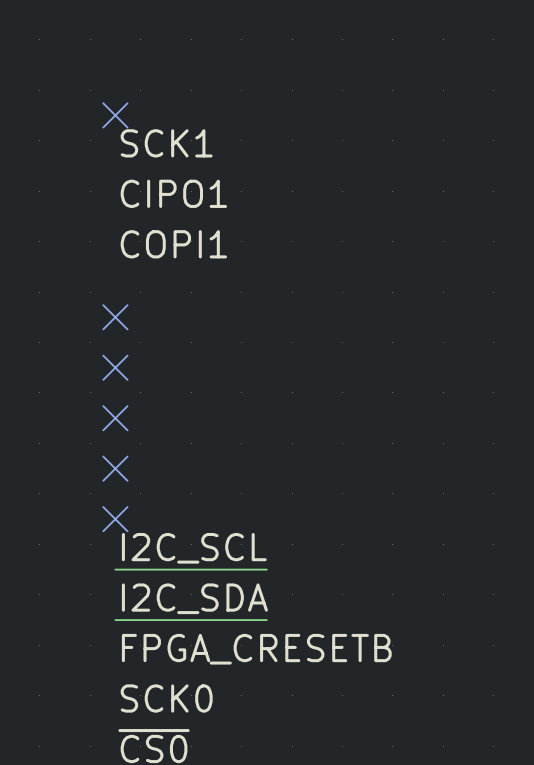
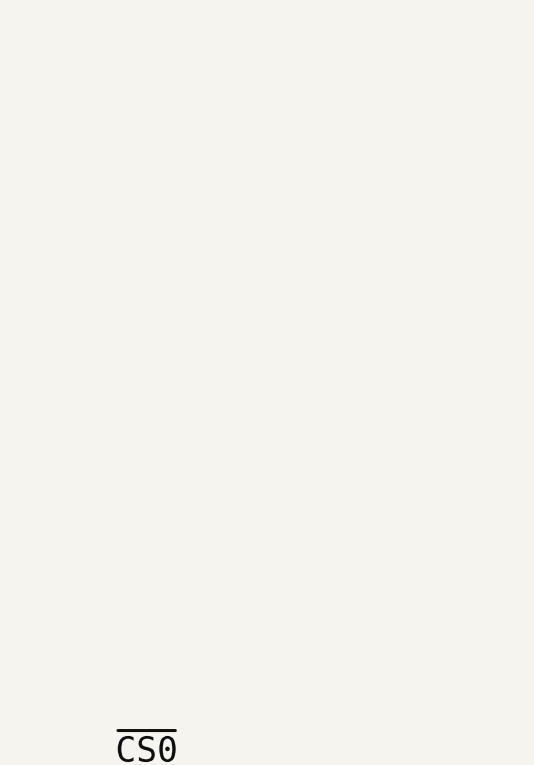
no-connect mark: (115, 115) -> none
label: SCK1 (166, 143) -> none
label: CIPO1 (173, 193) -> none
label: COPI1 (173, 244) -> none
no-connect mark: (115, 317) -> none
no-connect mark: (115, 367) -> none
no-connect mark: (115, 418) -> none
no-connect mark: (115, 468) -> none
no-connect mark: (115, 519) -> none
label: I2C_SCL (194, 548) -> none
wire: (115, 569) (266, 569) -> none
label: I2C_SDA (194, 598) -> none
wire: (115, 620) (266, 620) -> none
label: FPGA_CRESETB (256, 649) -> none
label: SCK0 (166, 698) -> none

